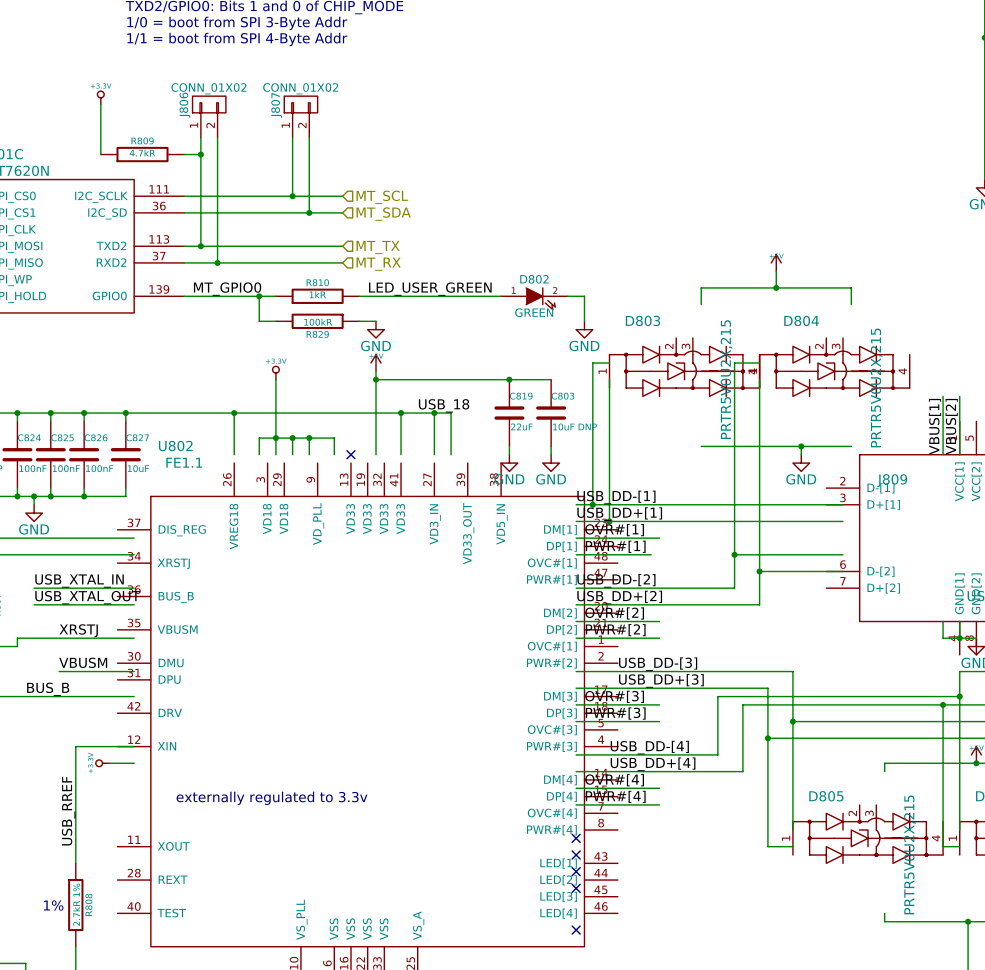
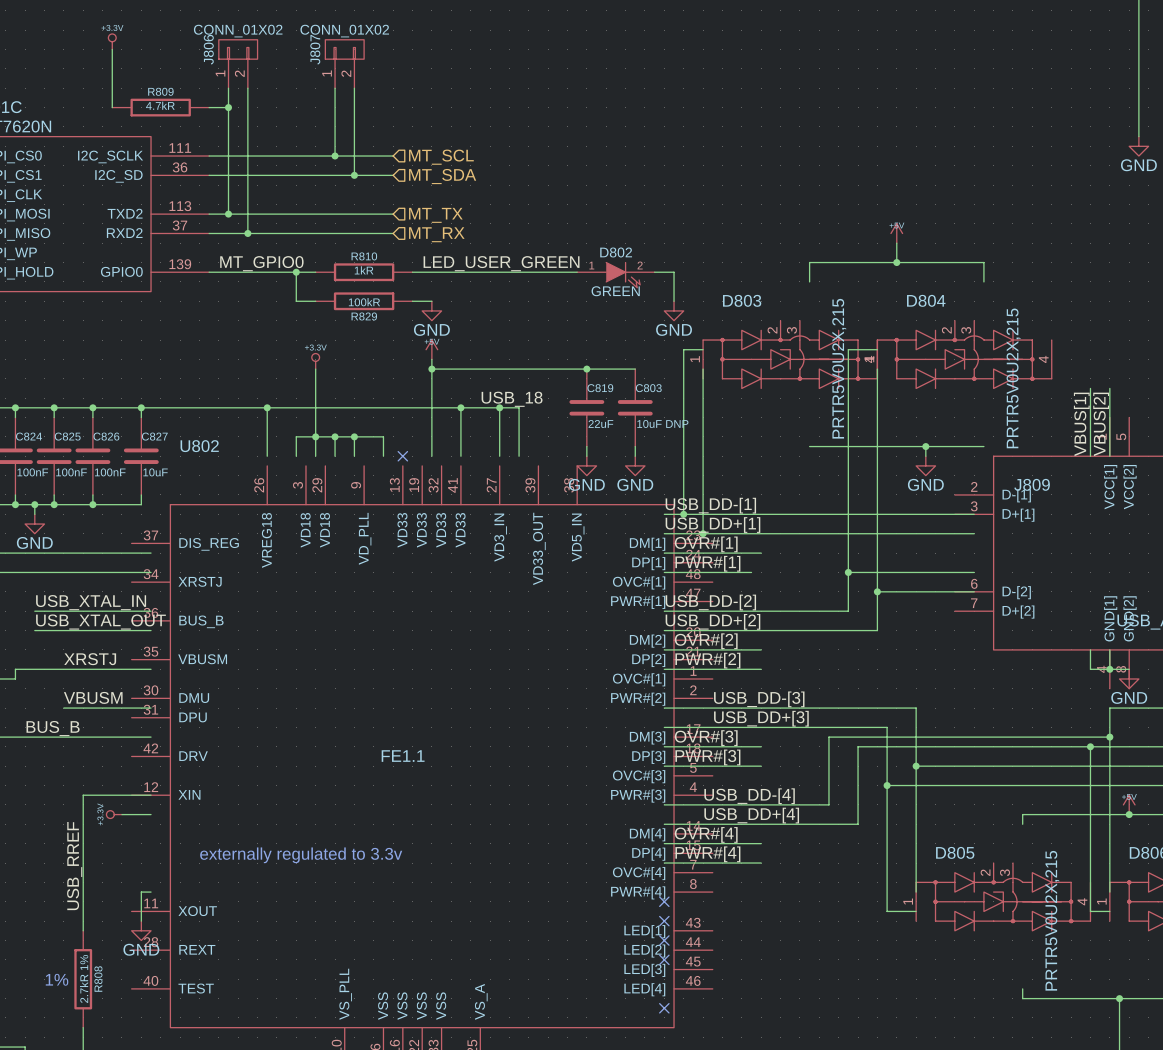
U802 value position: FE1.1 (184, 462) -> FE1.1 (403, 756)
wire: none -> (151, 892) (141, 892) (141, 921)
power symbol: none -> GND (141, 930)

